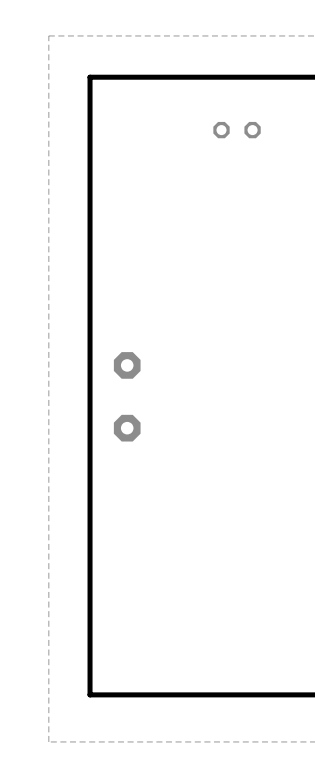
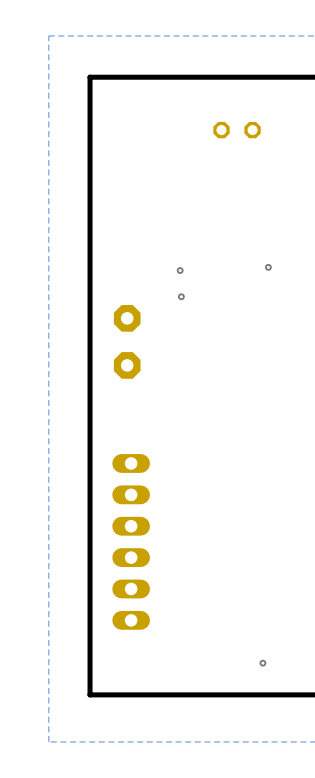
via: none -> (268, 267)
via: none -> (180, 270)
via: none -> (181, 296)
part position: (127, 428) -> (127, 318)
part: none -> (131, 541)
via: none -> (262, 663)

